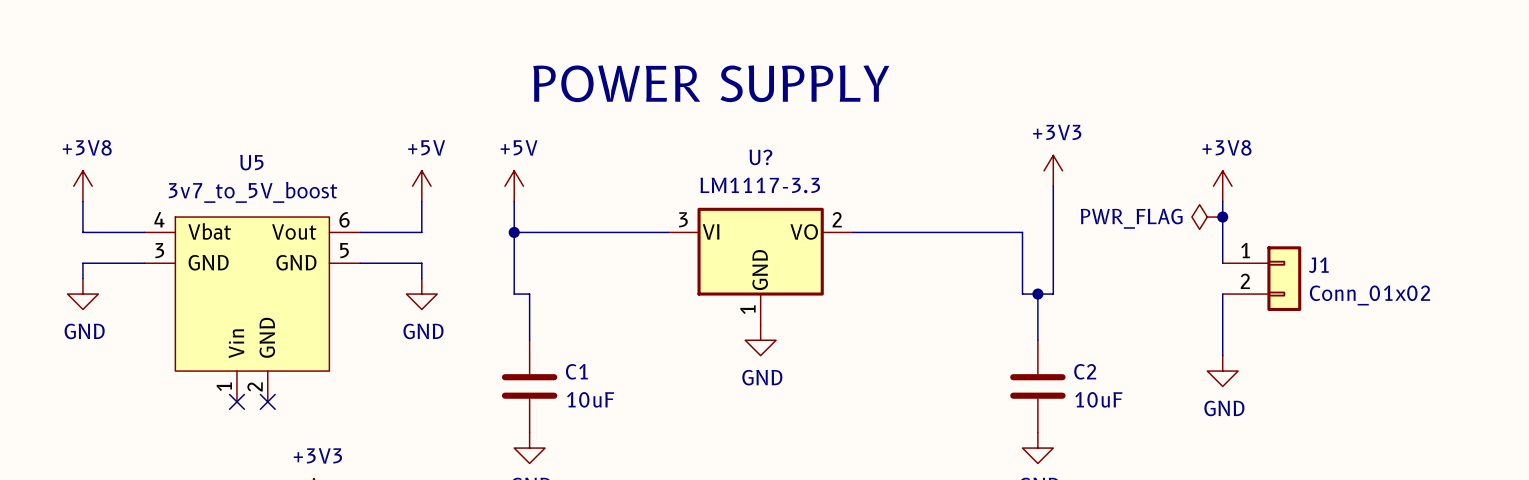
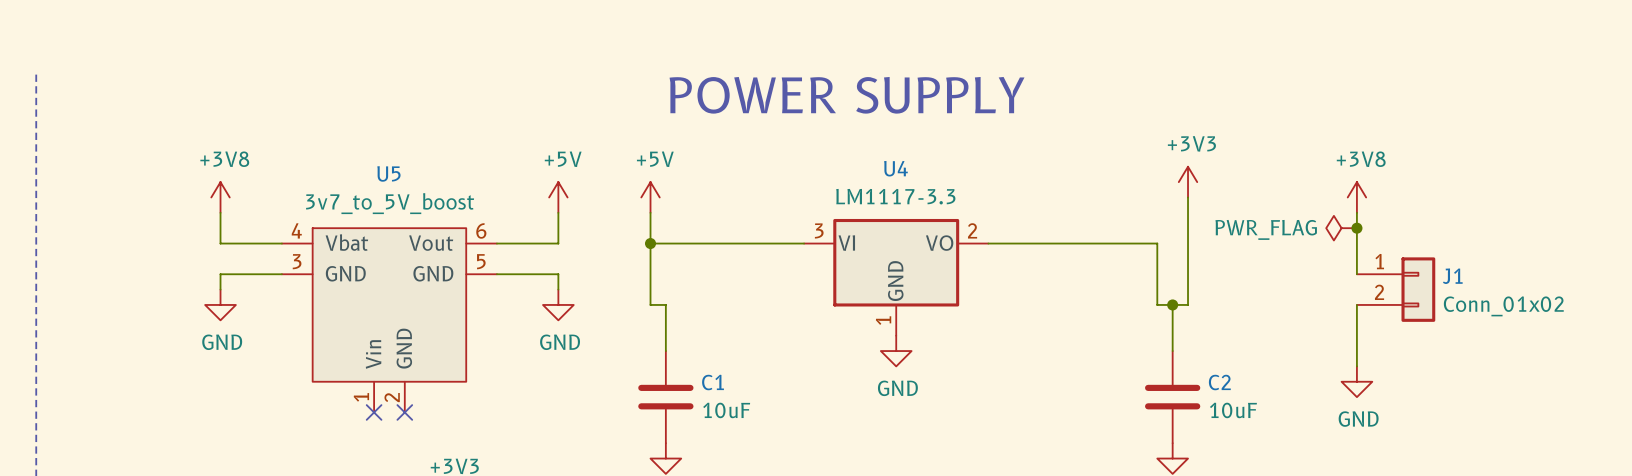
U? name: U? (760, 157) -> U4 (895, 168)

